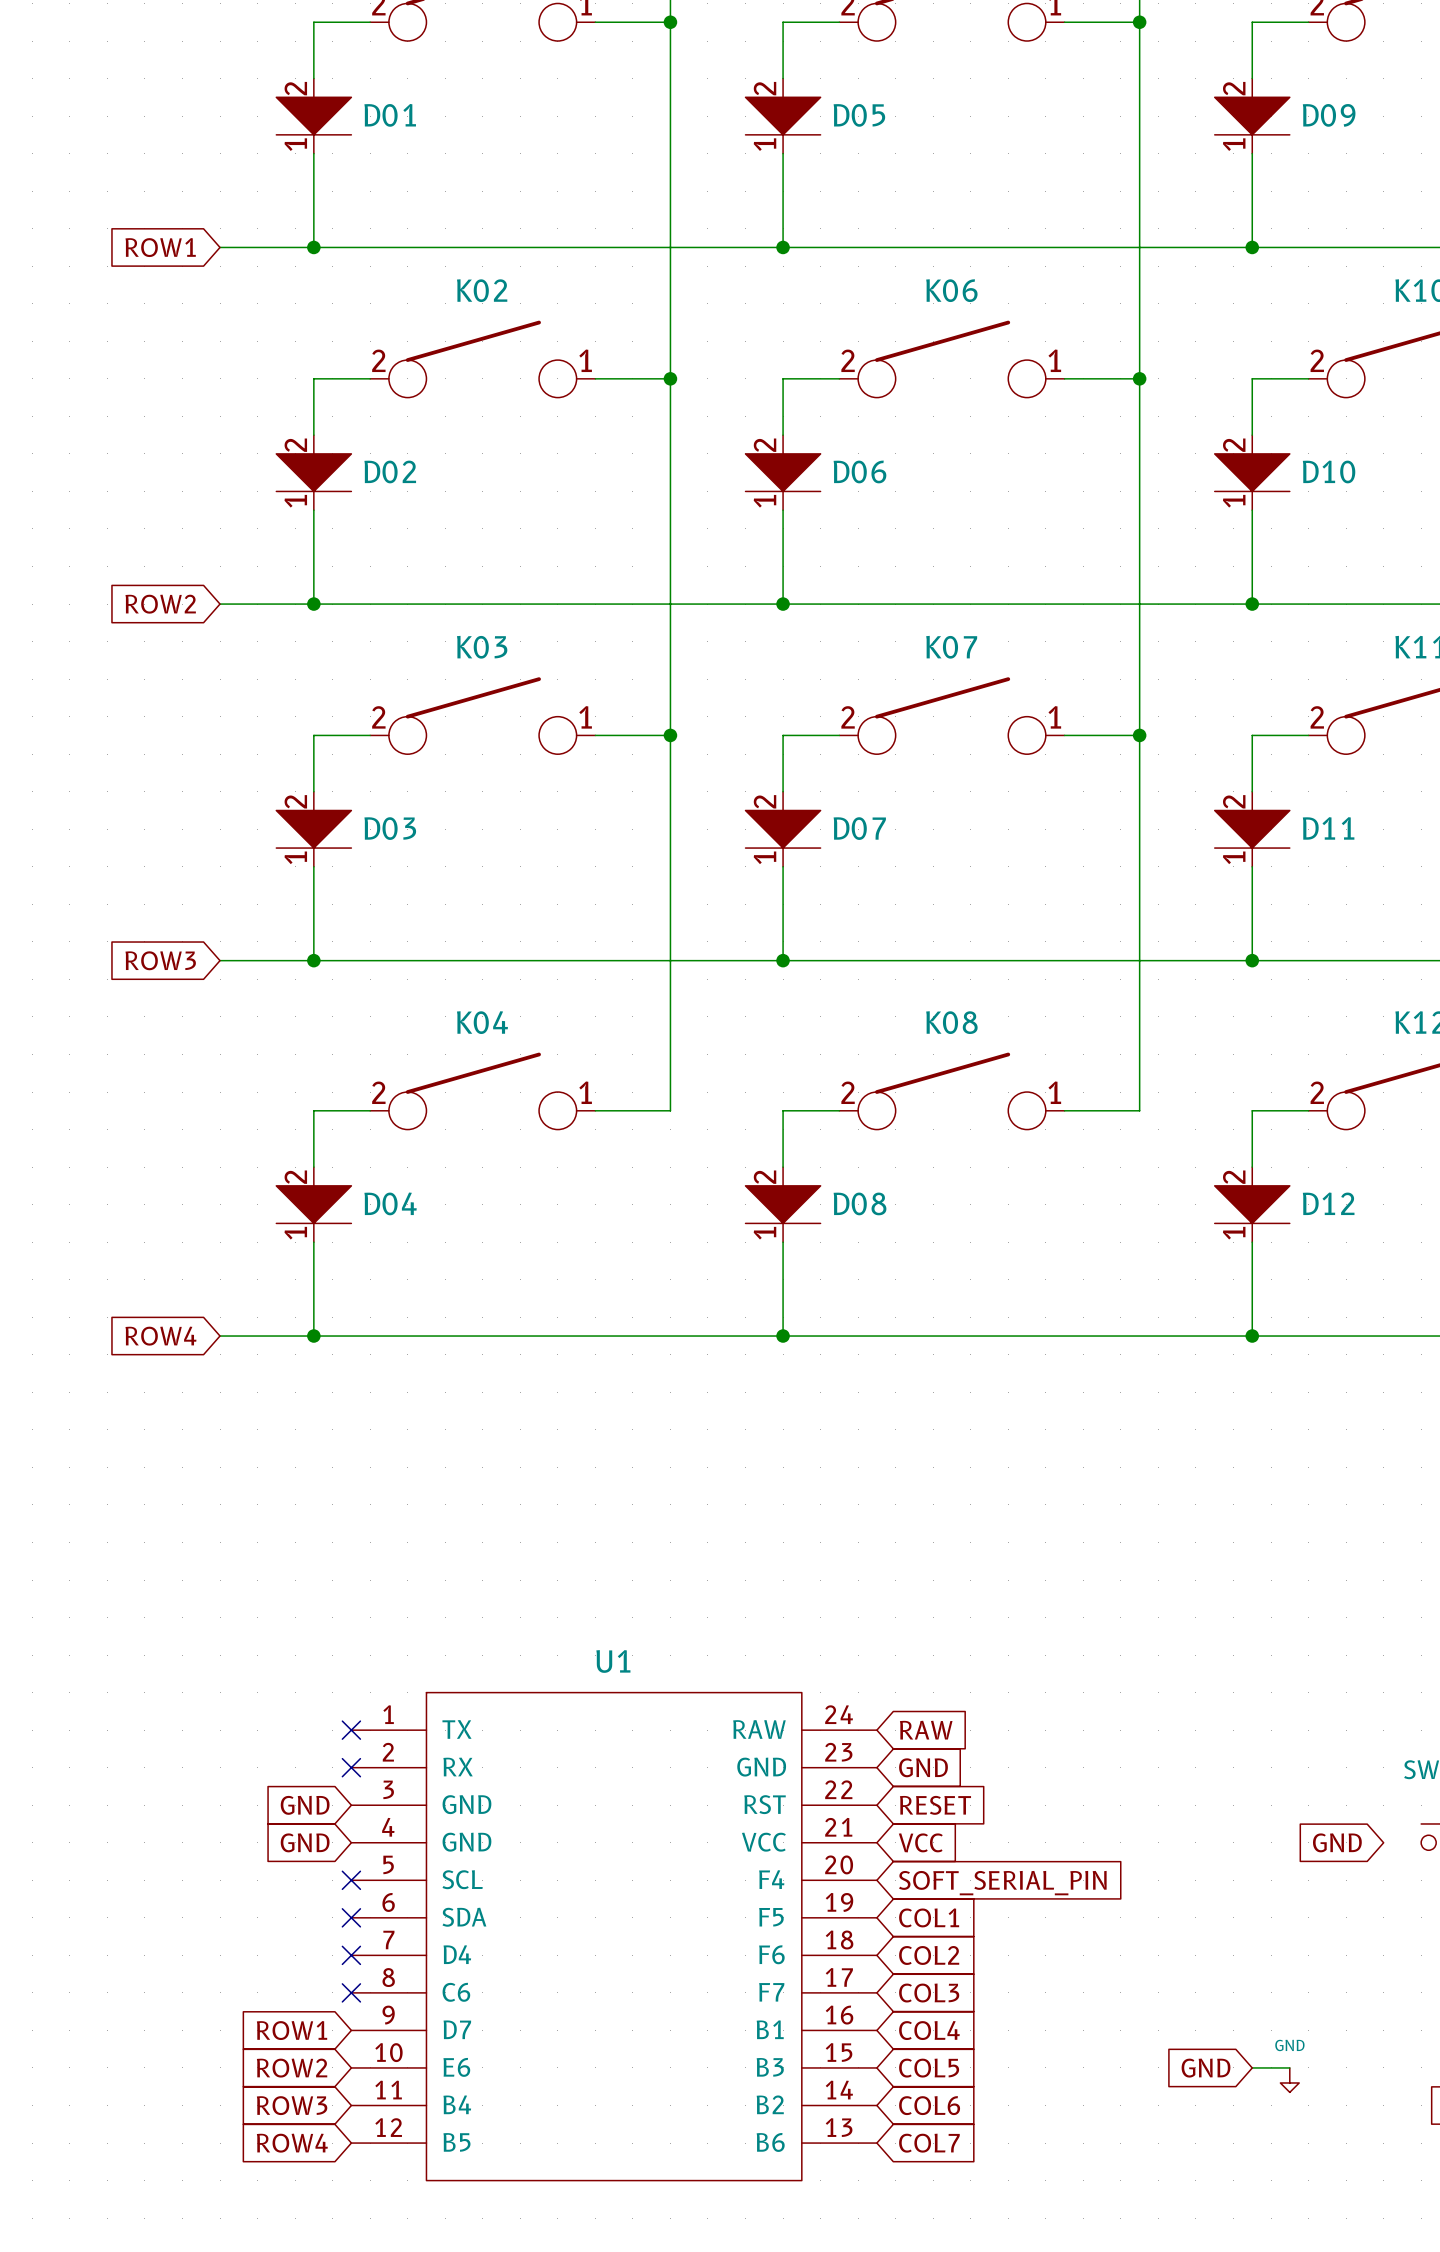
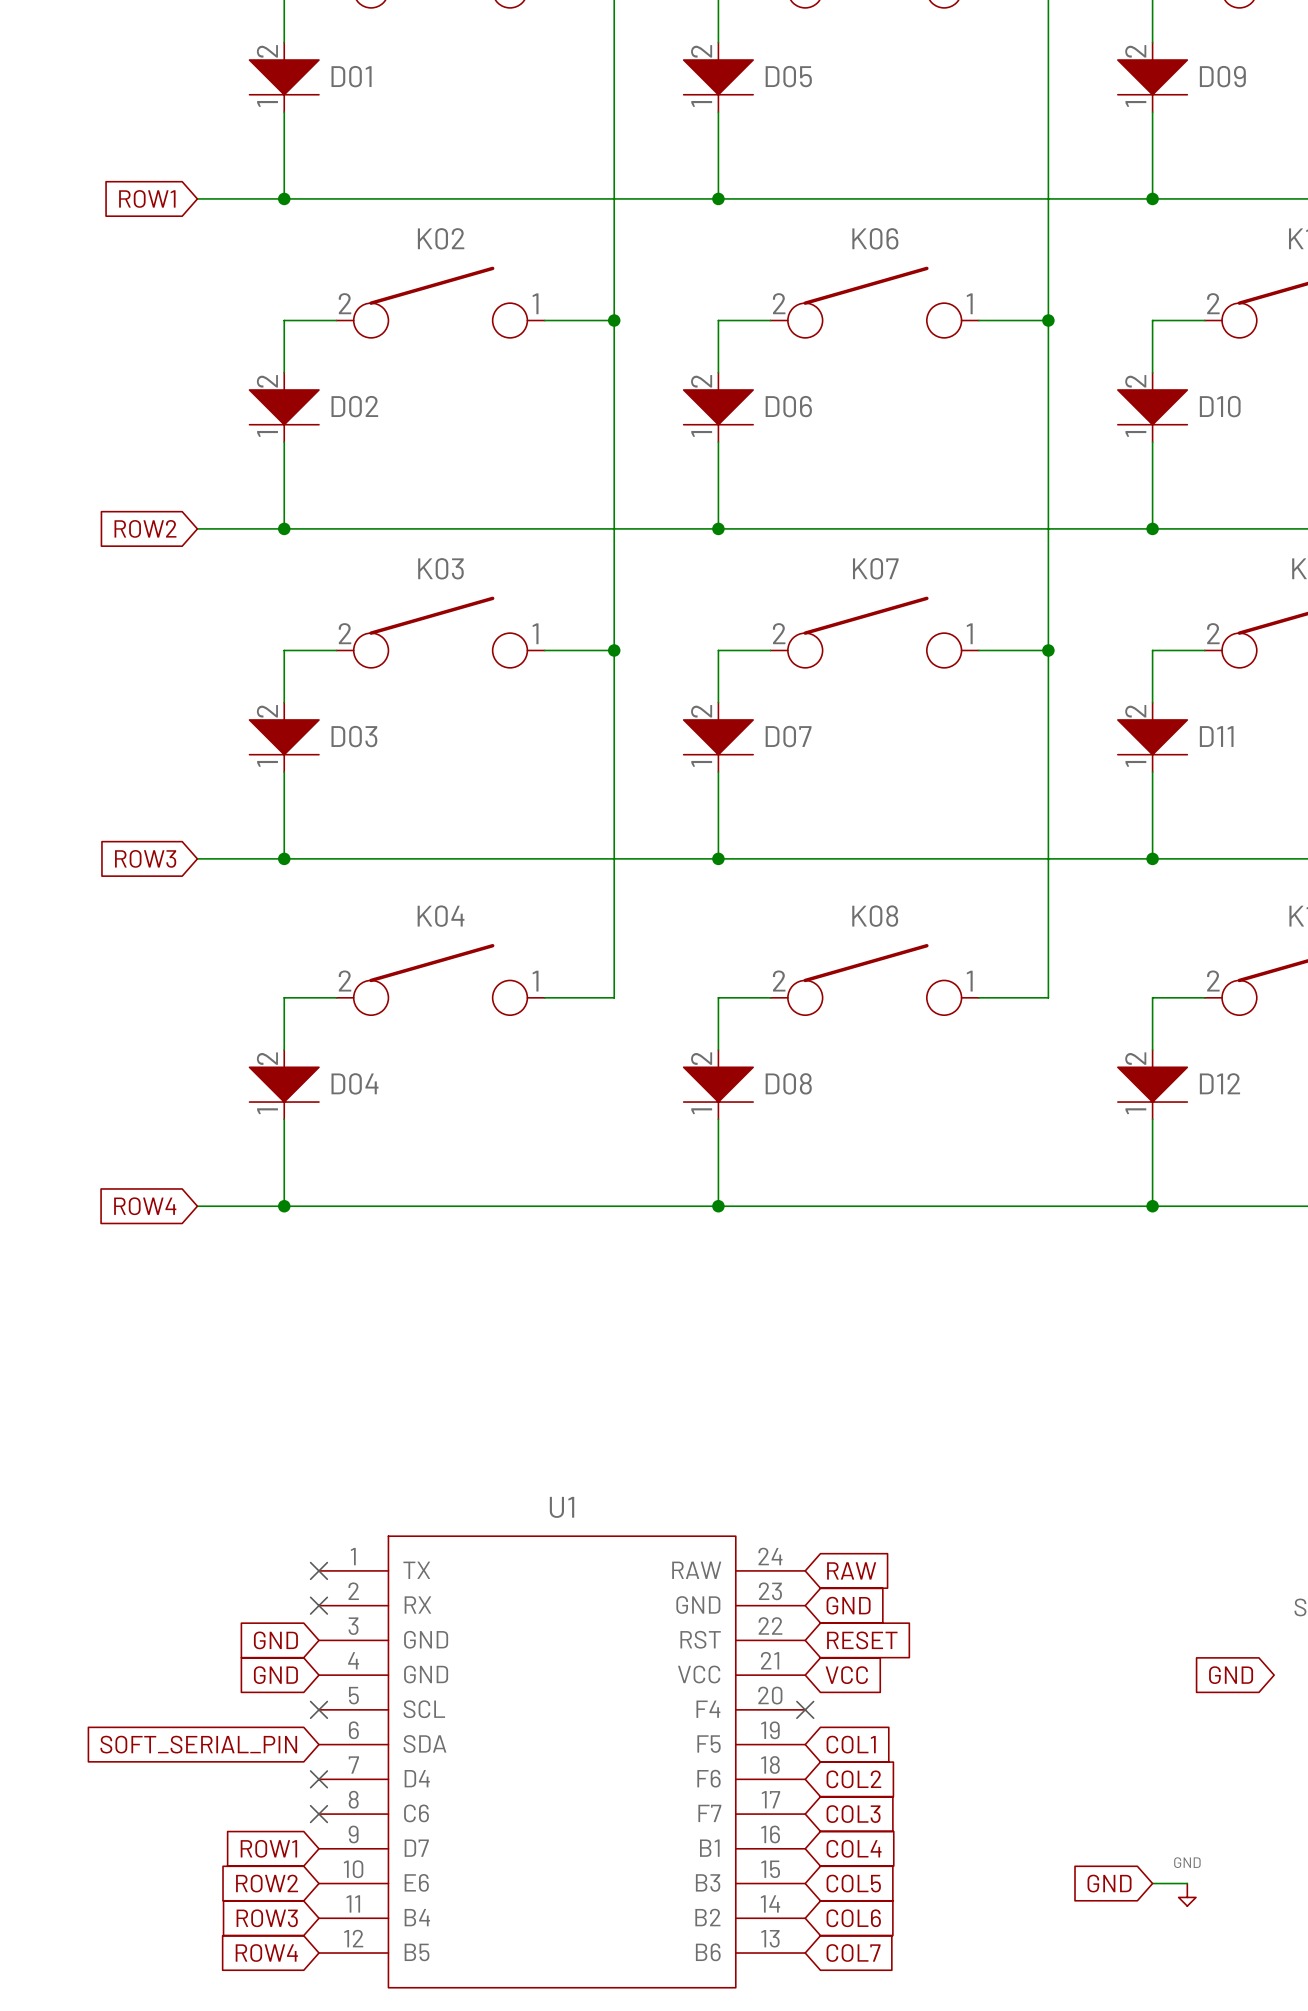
no-connect mark: none -> (805, 1709)
global label: SOFT_SERIAL_PIN (1002, 1883) -> none
no-connect mark: (351, 1917) -> none
global label: none -> SOFT_SERIAL_PIN (198, 1744)

